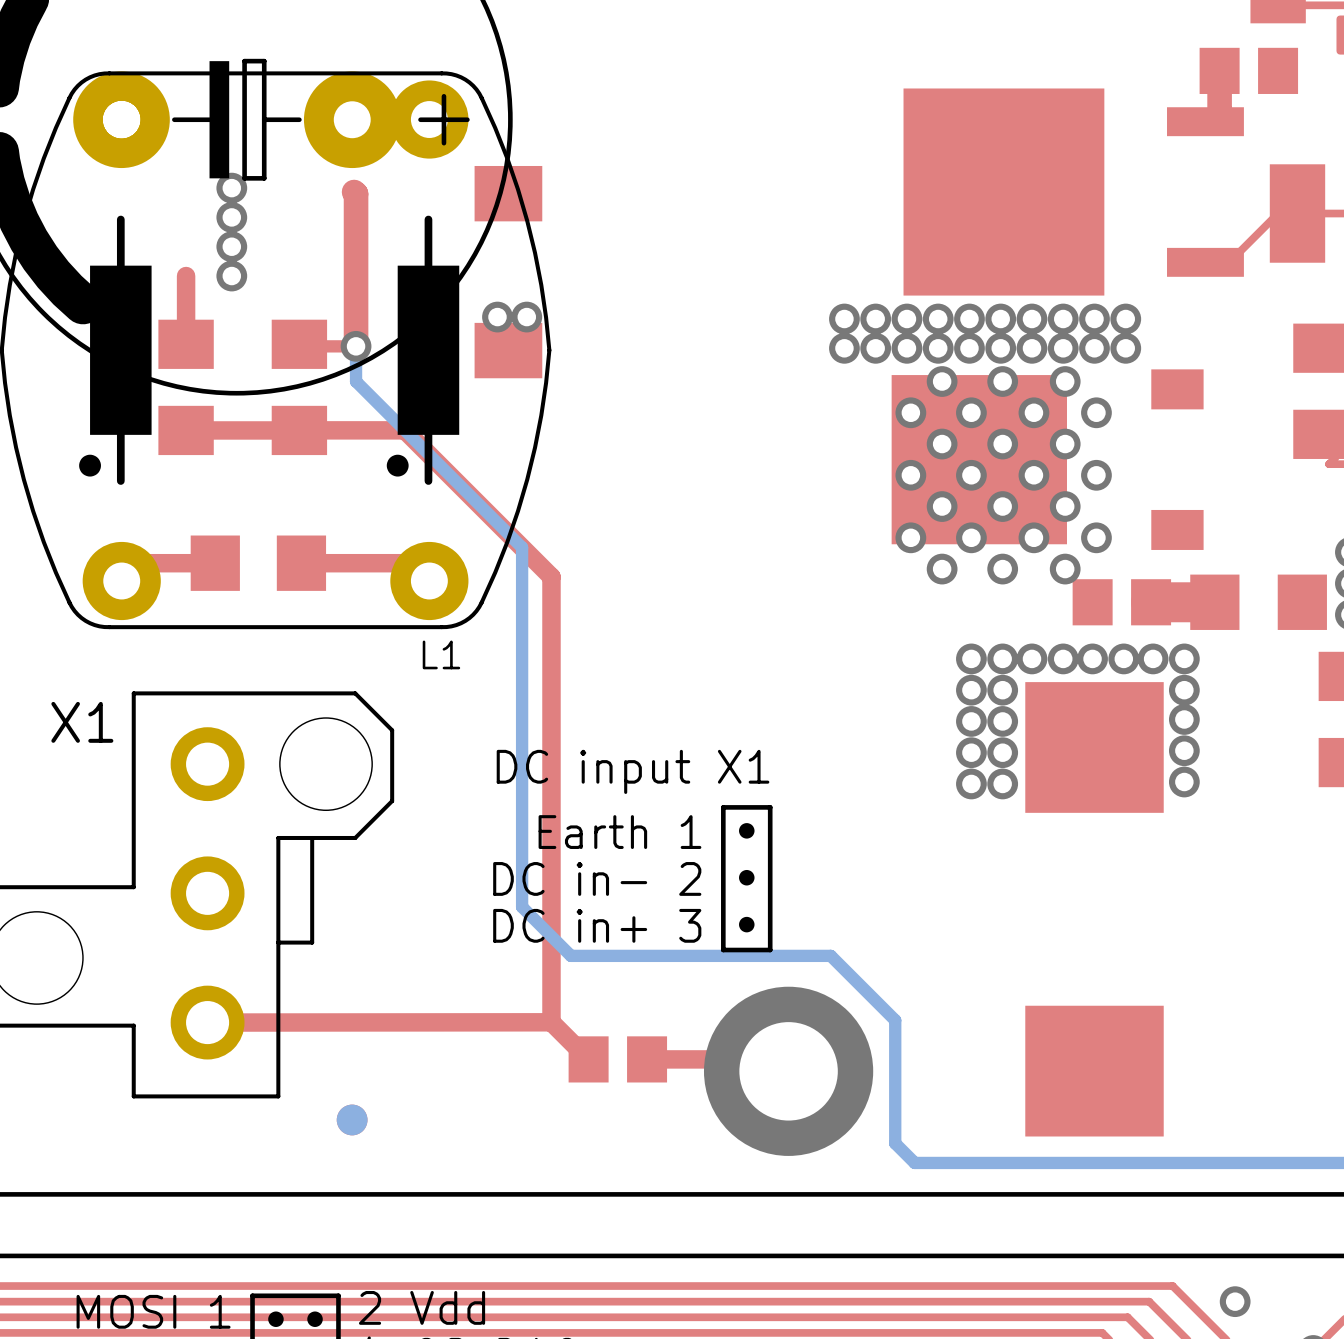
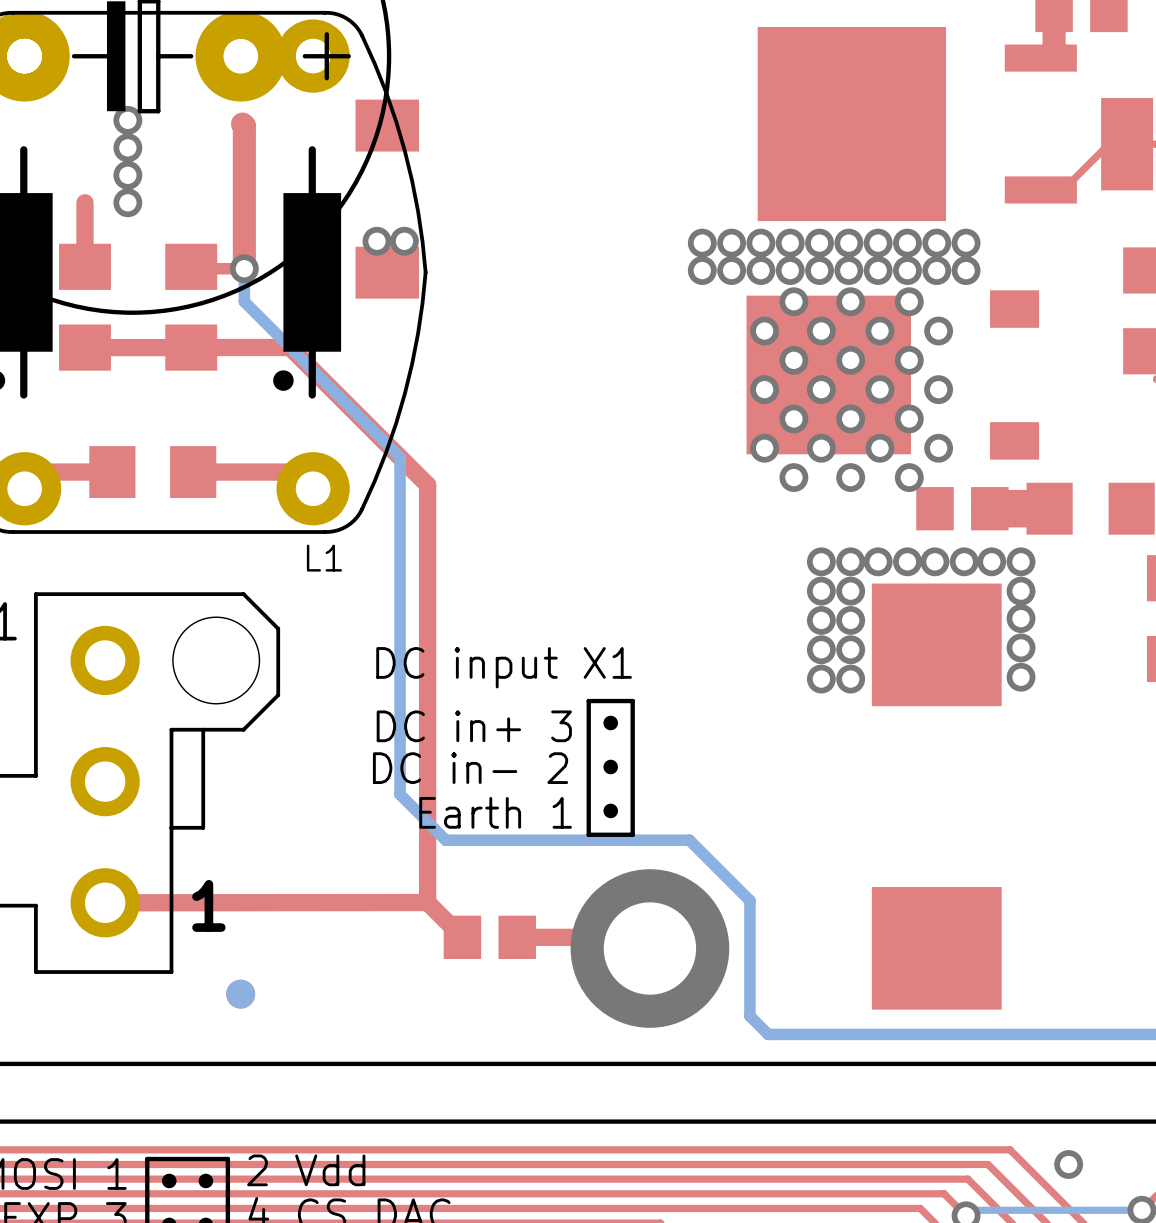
text: Earth 1 (619, 832) -> DC in+ 3 (474, 726)
text: DC in+ 3 (597, 925) -> Earth 1 (495, 812)
text: none -> 1 (208, 905)

